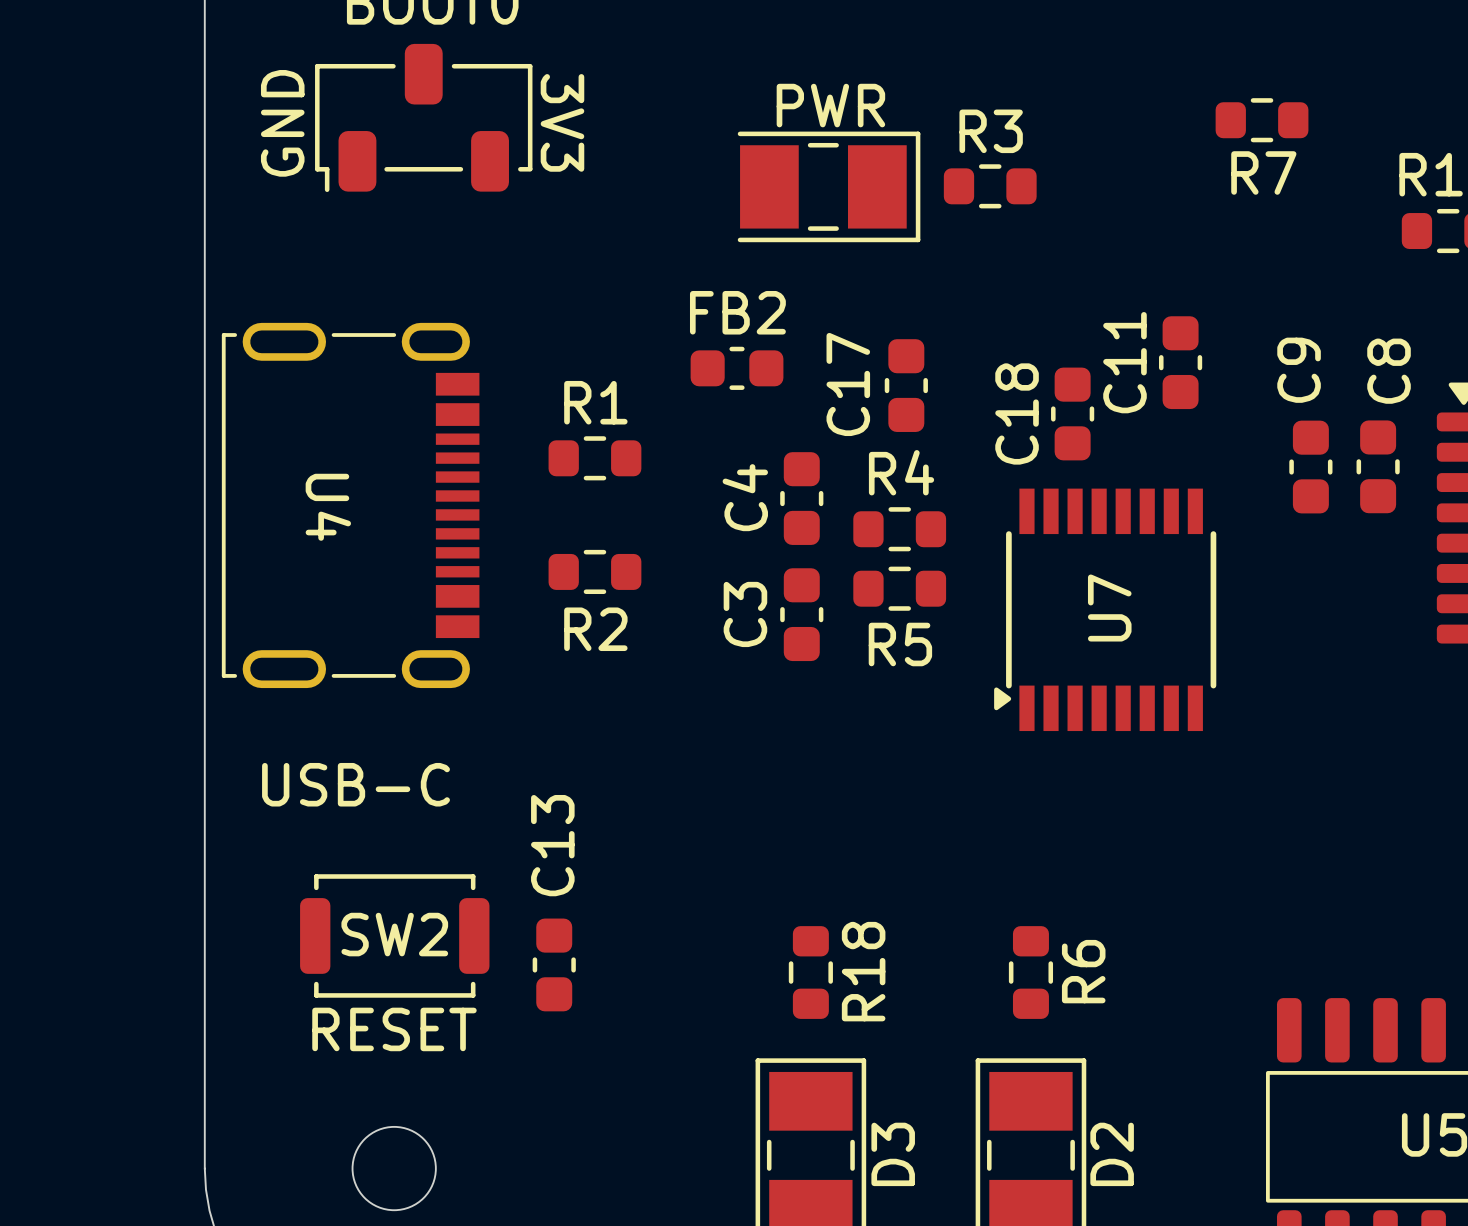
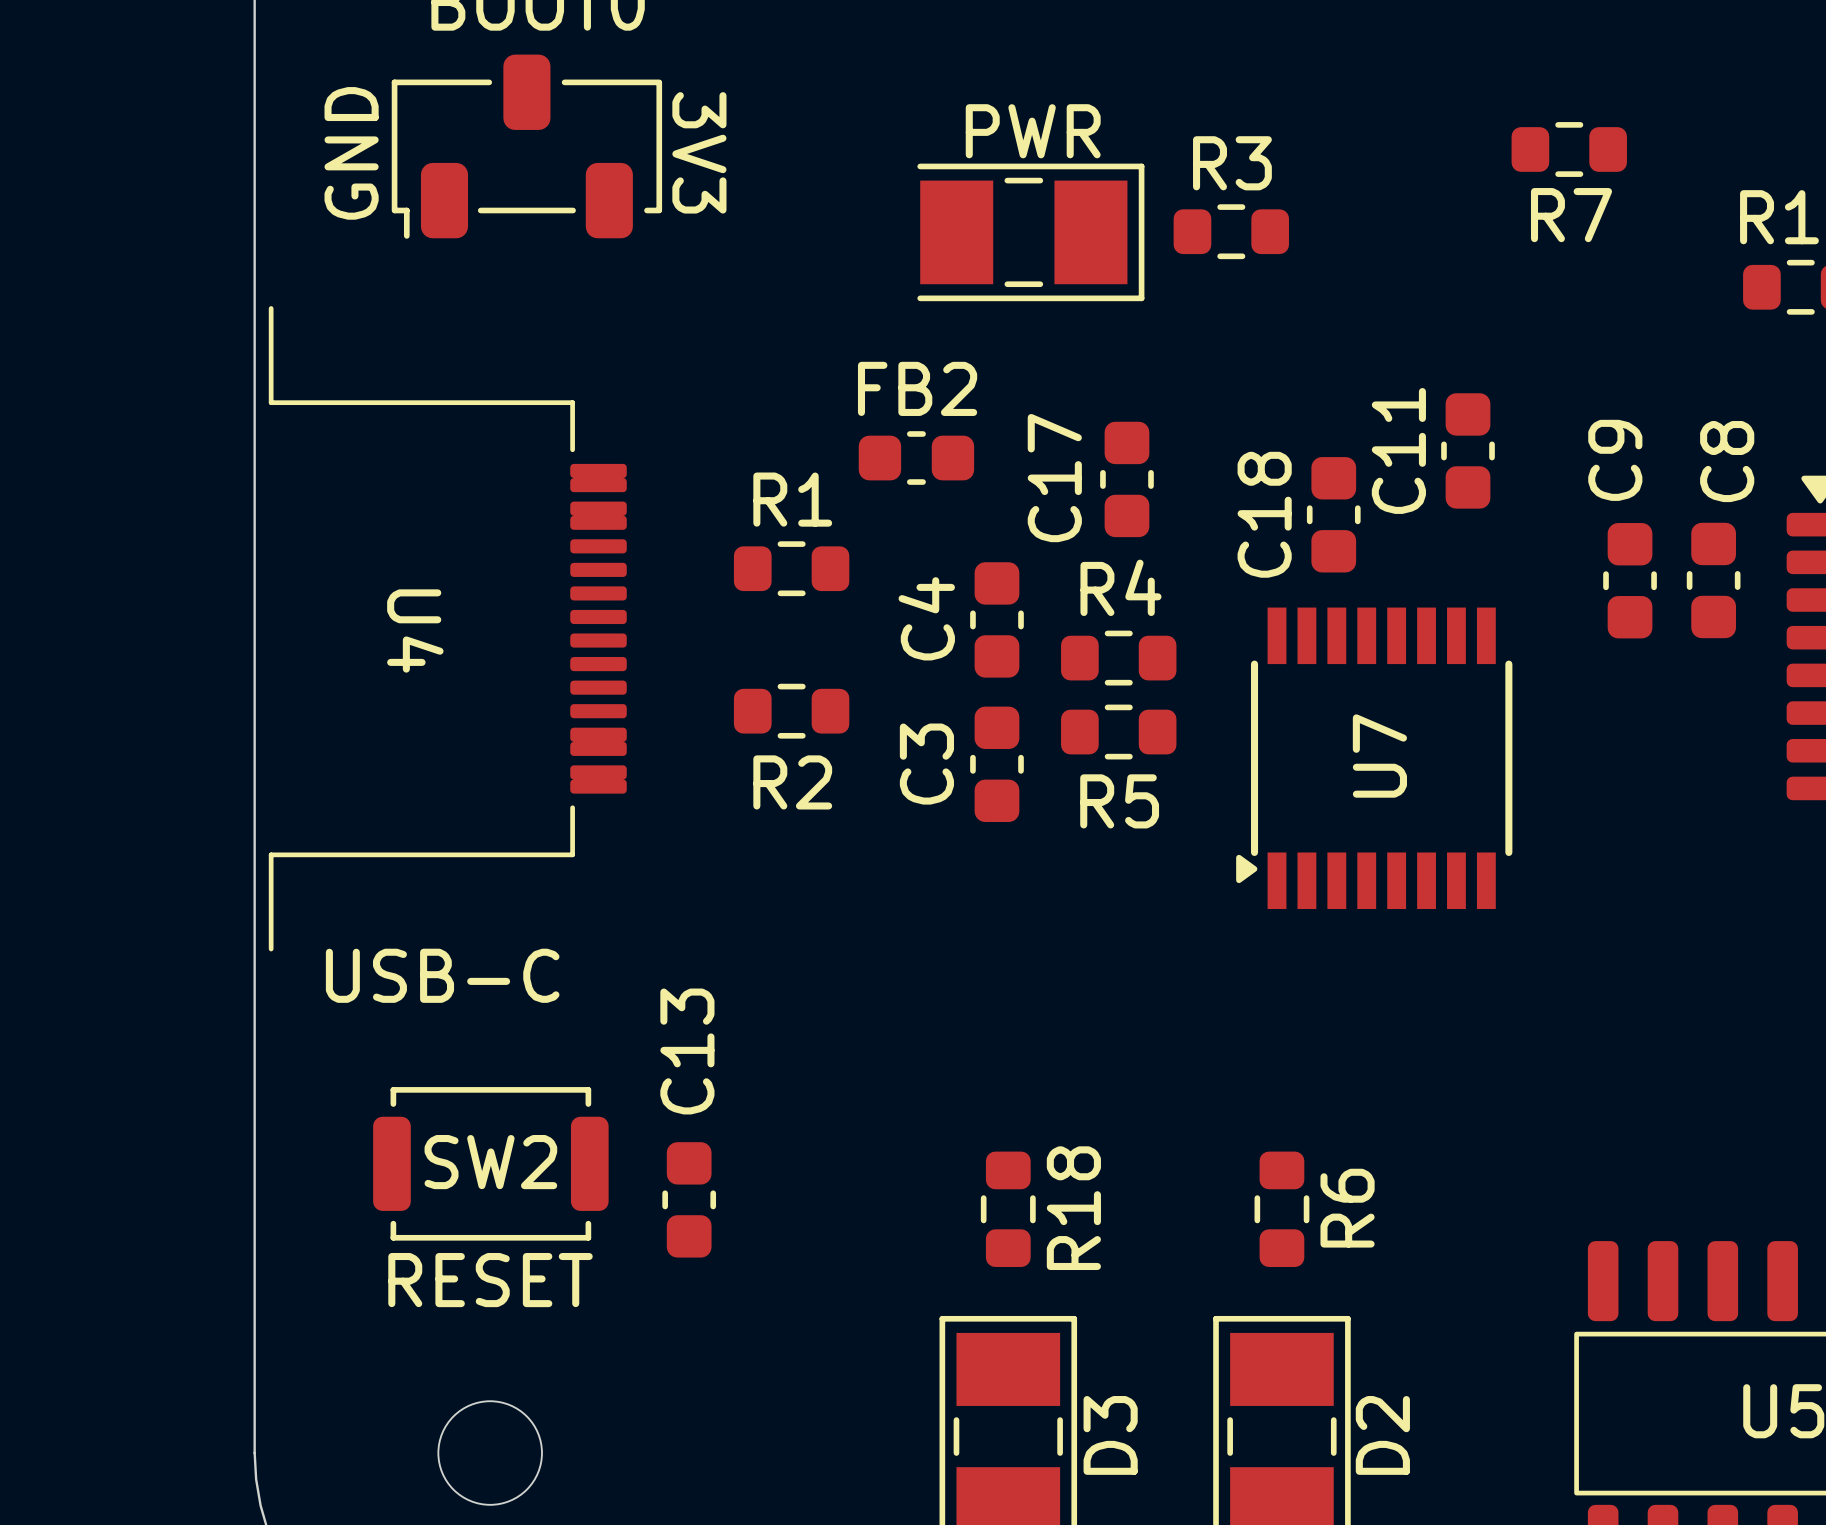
U4 footprint: [221, 322, 480, 689] -> [268, 306, 627, 952]
R1 position: (594, 458) -> (791, 568)
R2 position: (594, 571) -> (791, 711)

